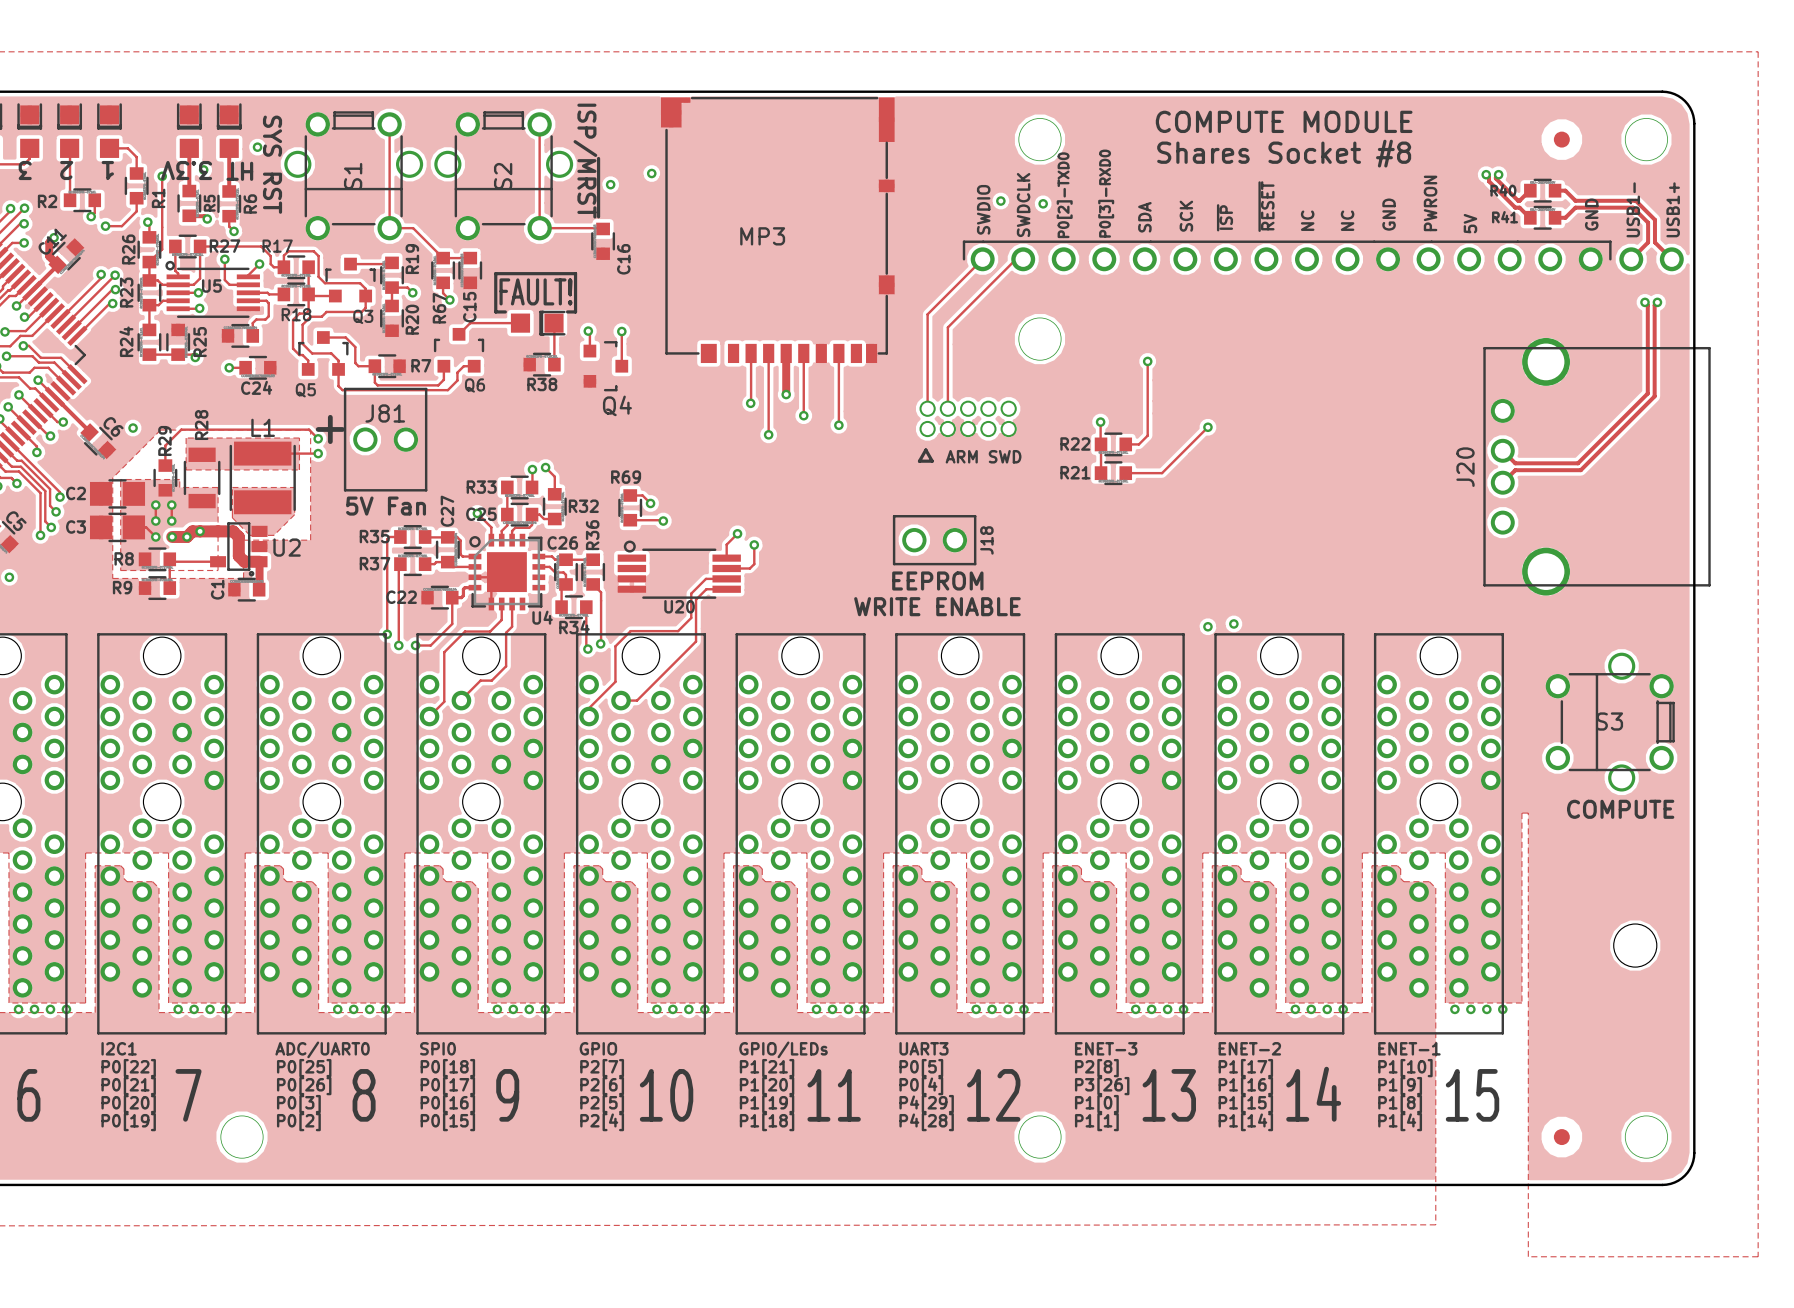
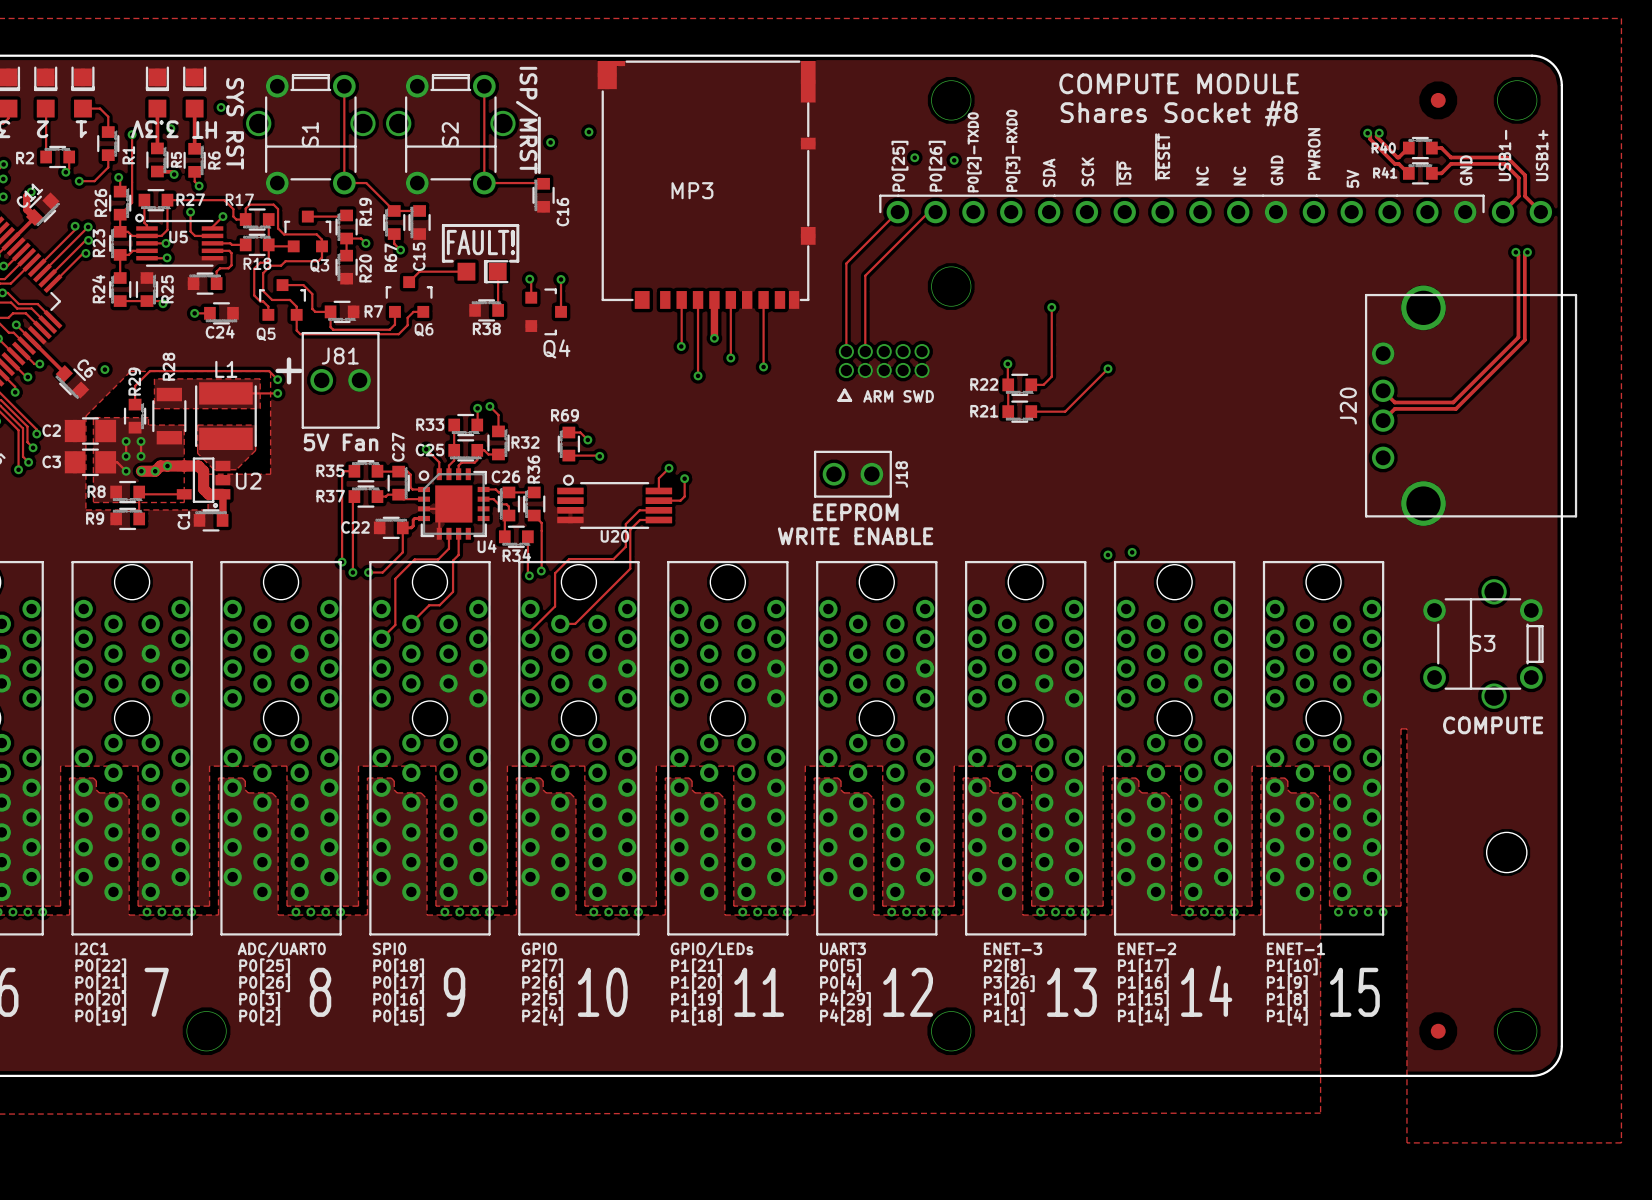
part footprint: [962, 240, 1684, 272] -> [879, 194, 1553, 224]

